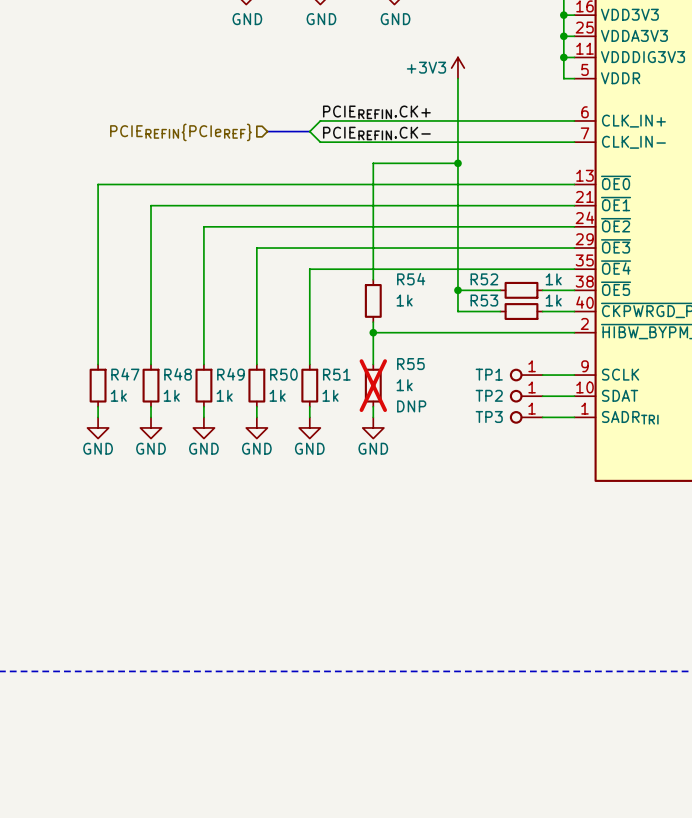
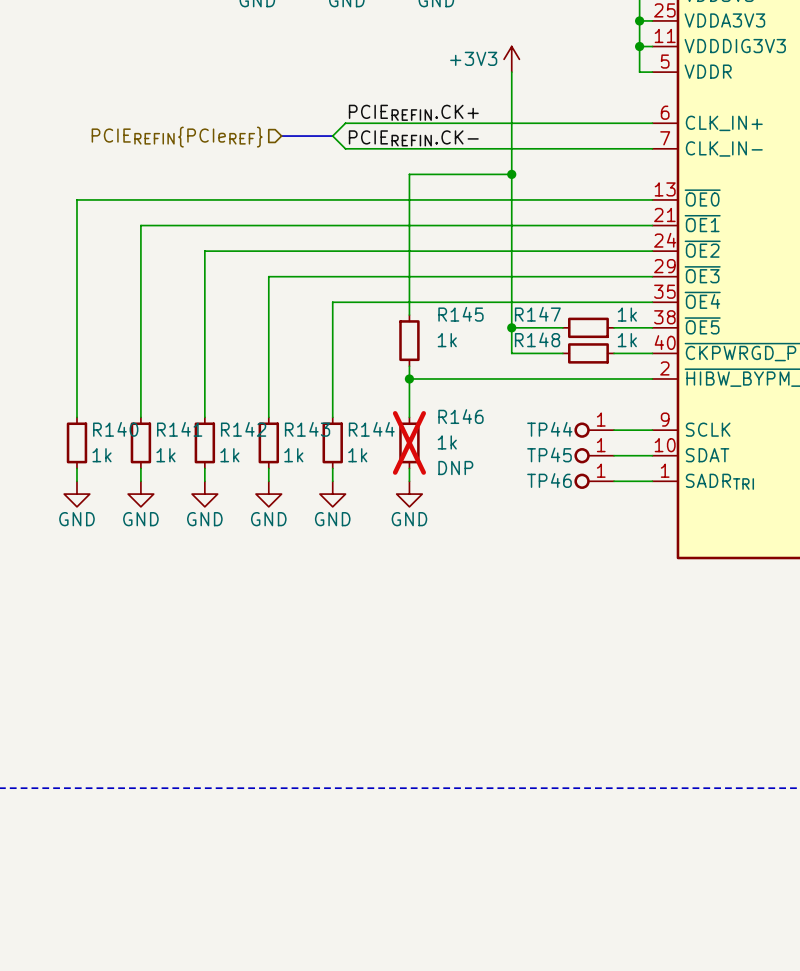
R54 name: R54 (411, 279) -> R145 (460, 314)
R52 name: R52 (484, 279) -> R147 (537, 314)
R53 name: R53 (484, 300) -> R148 (537, 339)
R55 name: R55 (410, 364) -> R146 (460, 416)
R47 name: R47 (125, 374) -> R140 (115, 429)
R48 name: R48 (178, 374) -> R141 (179, 429)
R49 name: R49 (230, 374) -> R142 (243, 429)
R50 name: R50 (283, 374) -> R143 (307, 429)
R51 name: R51 (336, 374) -> R144 (371, 429)
TP1 name: TP1 (489, 374) -> TP44 (549, 429)
TP2 name: TP2 (489, 395) -> TP45 (549, 454)
TP3 name: TP3 (489, 416) -> TP46 (549, 480)

